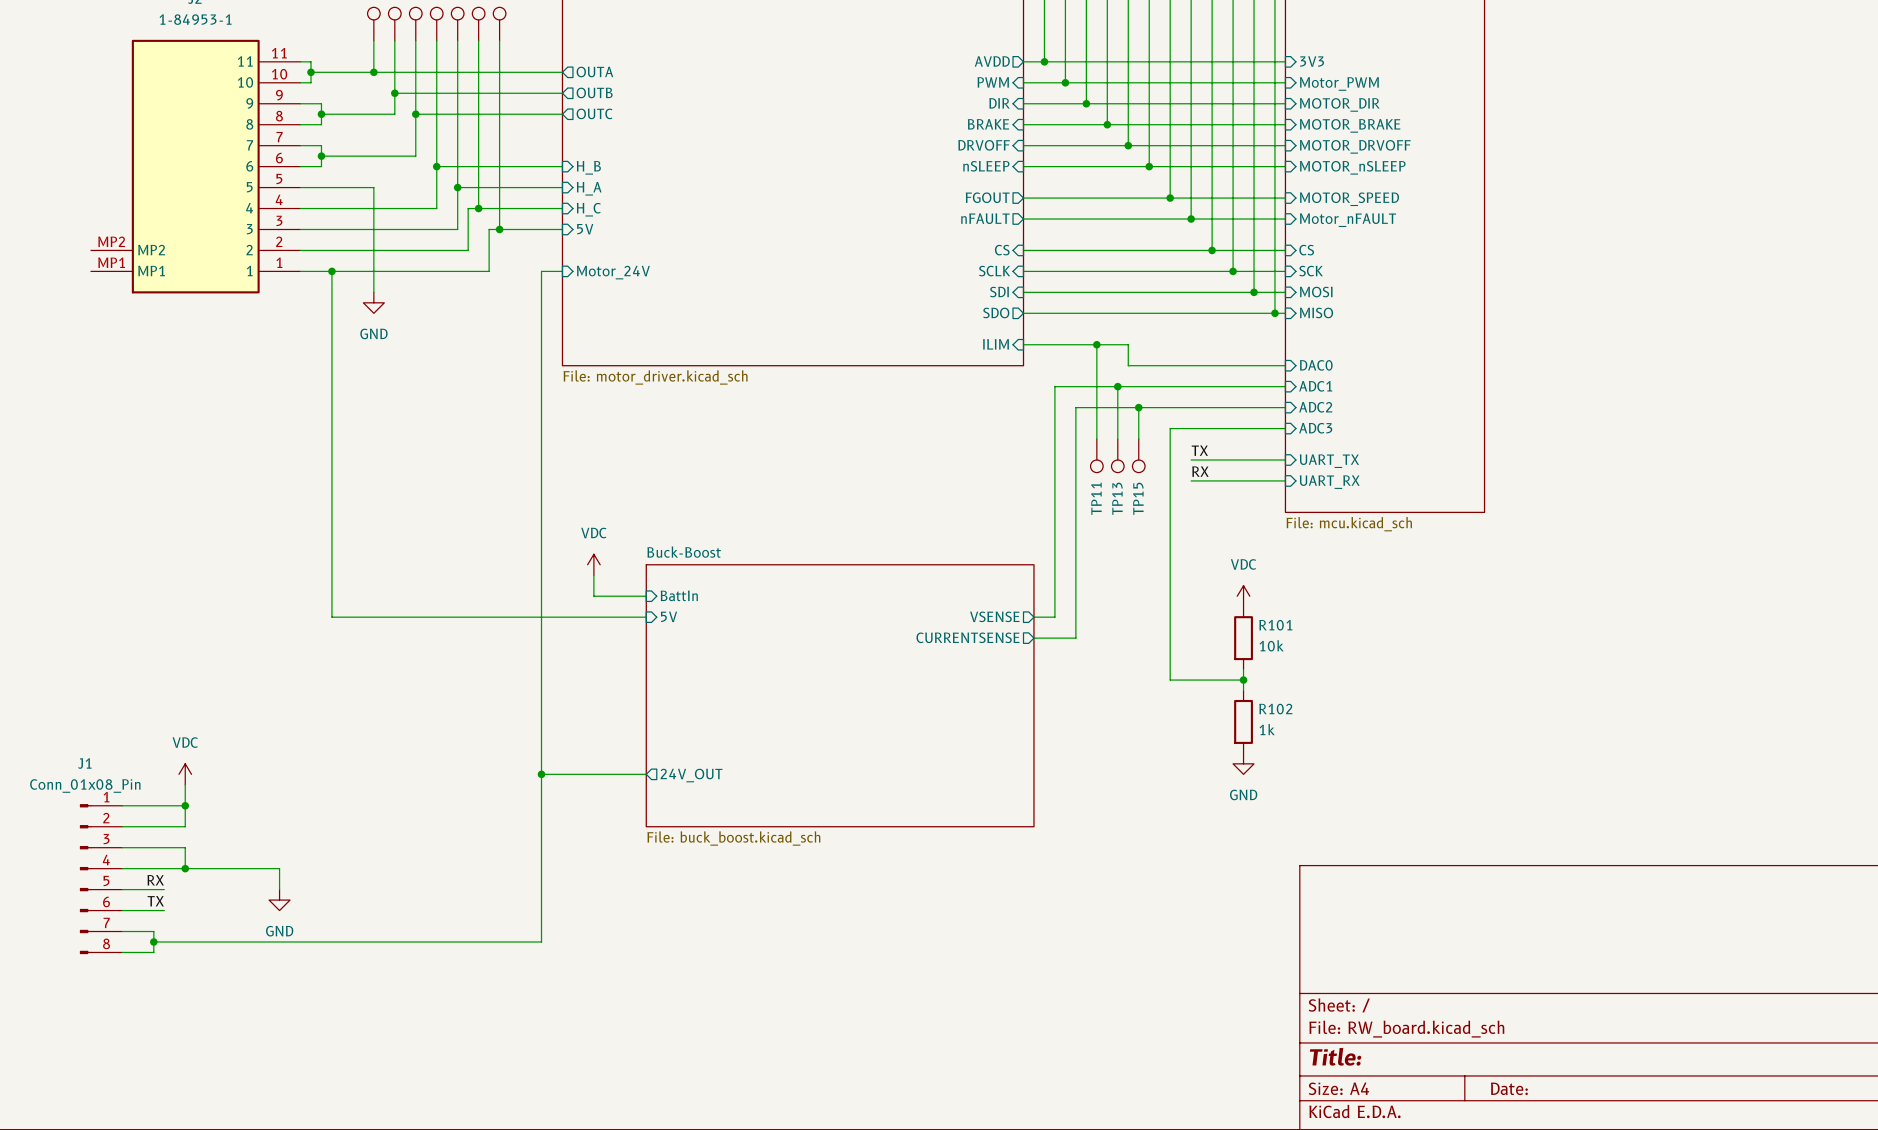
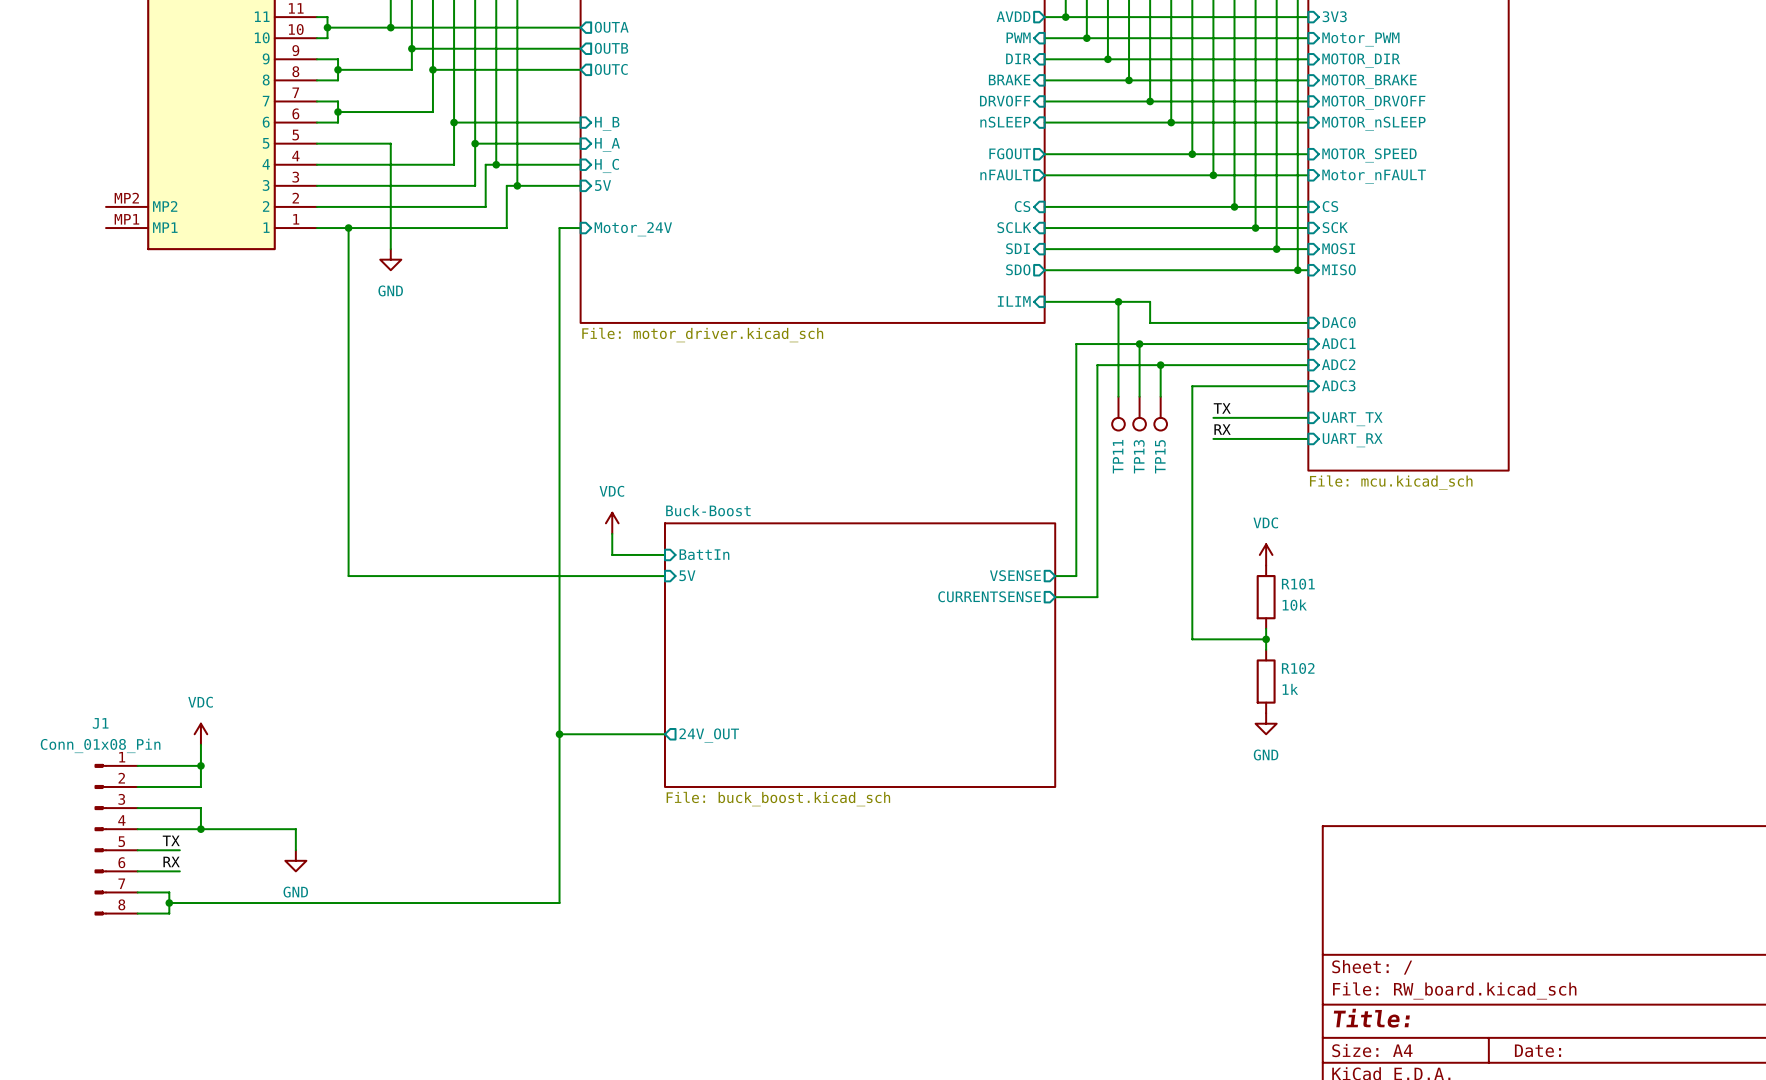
label: RX (155, 880) -> TX (171, 840)
label: TX (155, 901) -> RX (171, 861)

